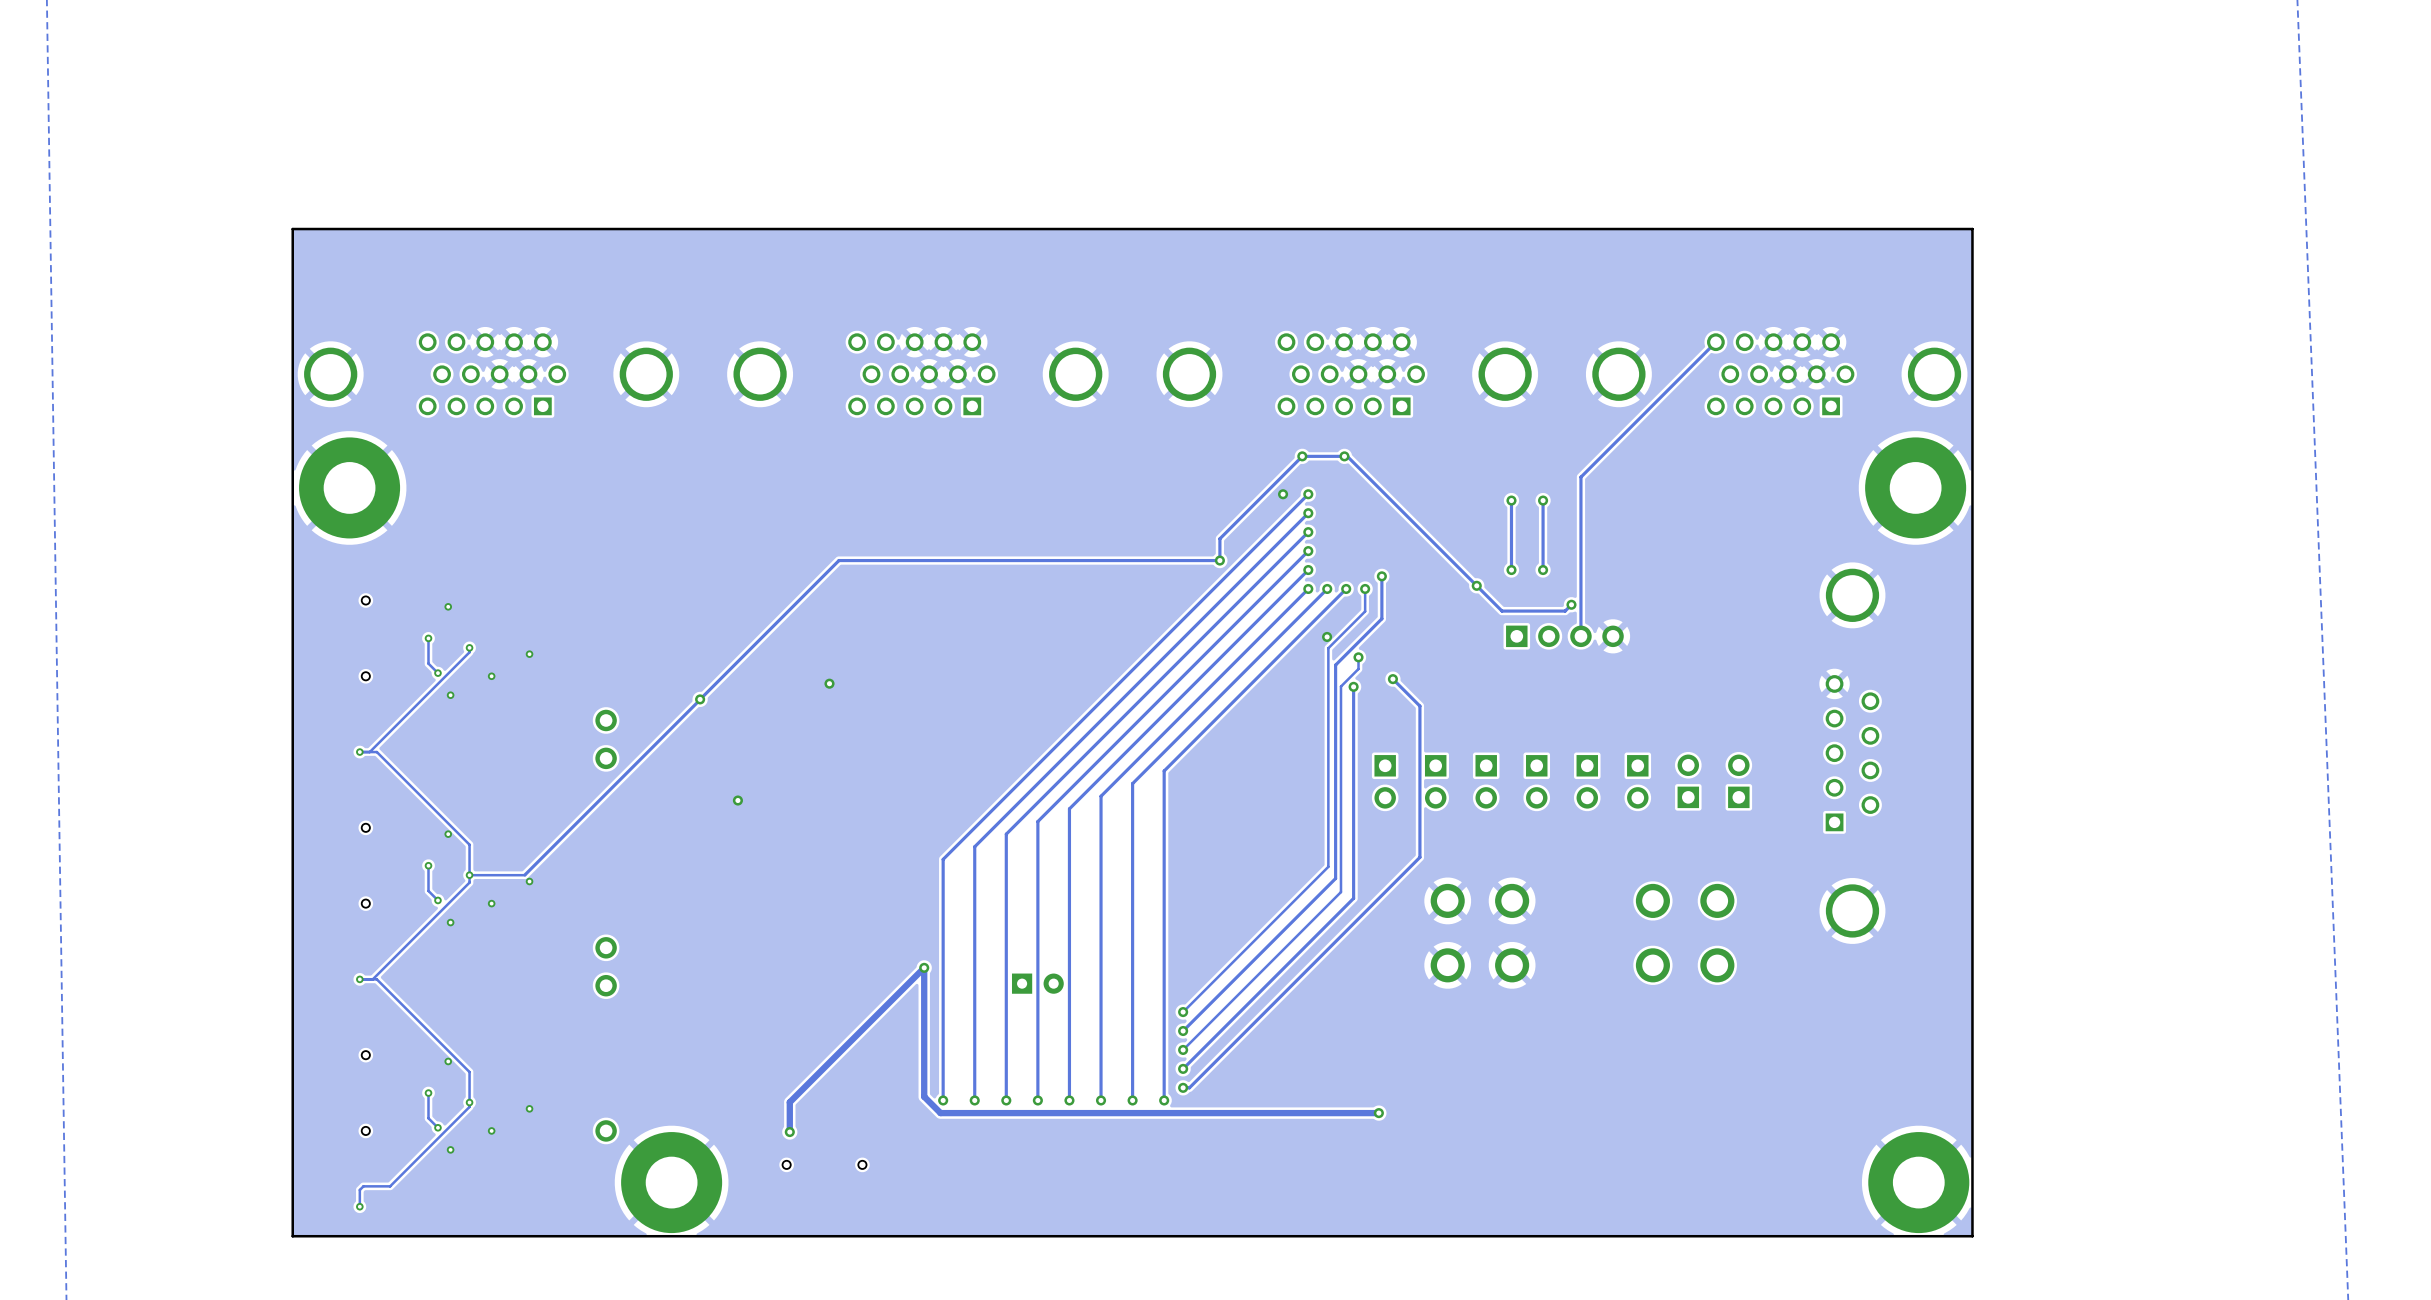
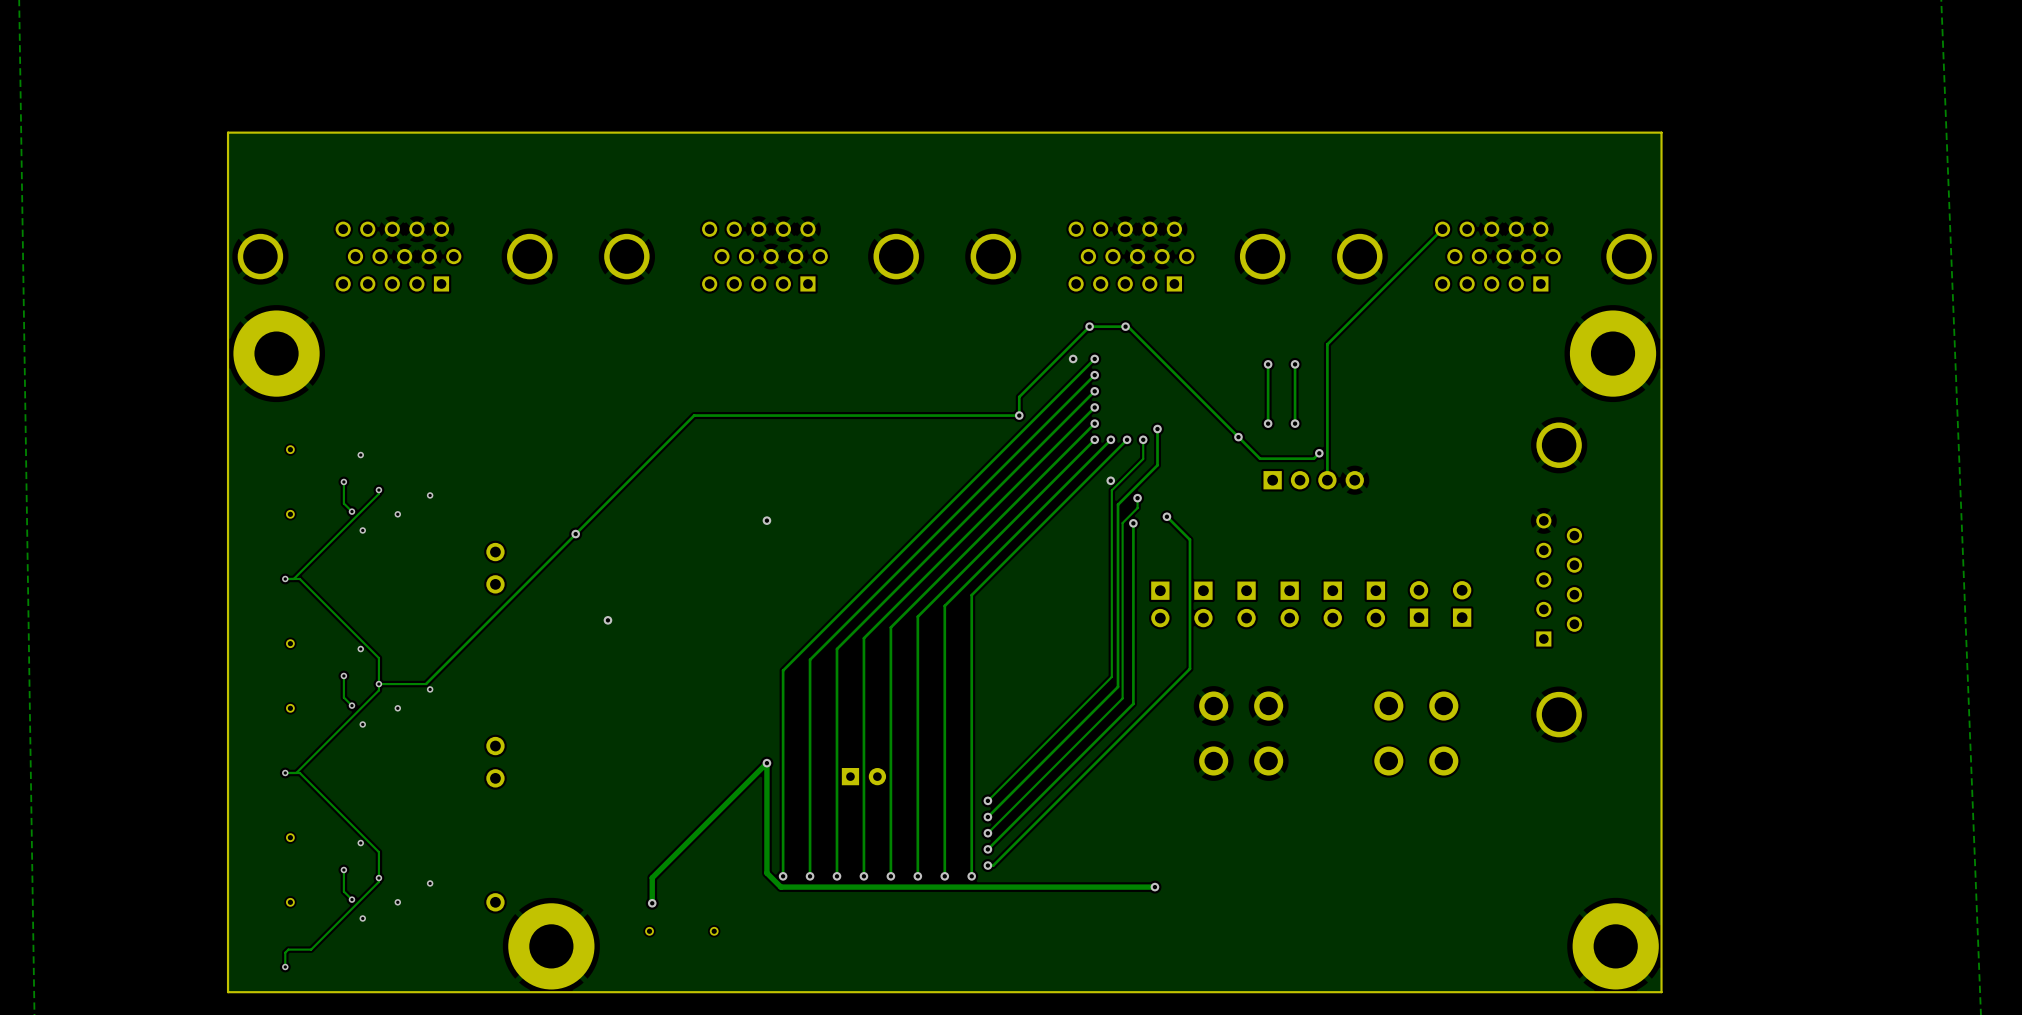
via: (829, 683) -> none
via: none -> (766, 520)

